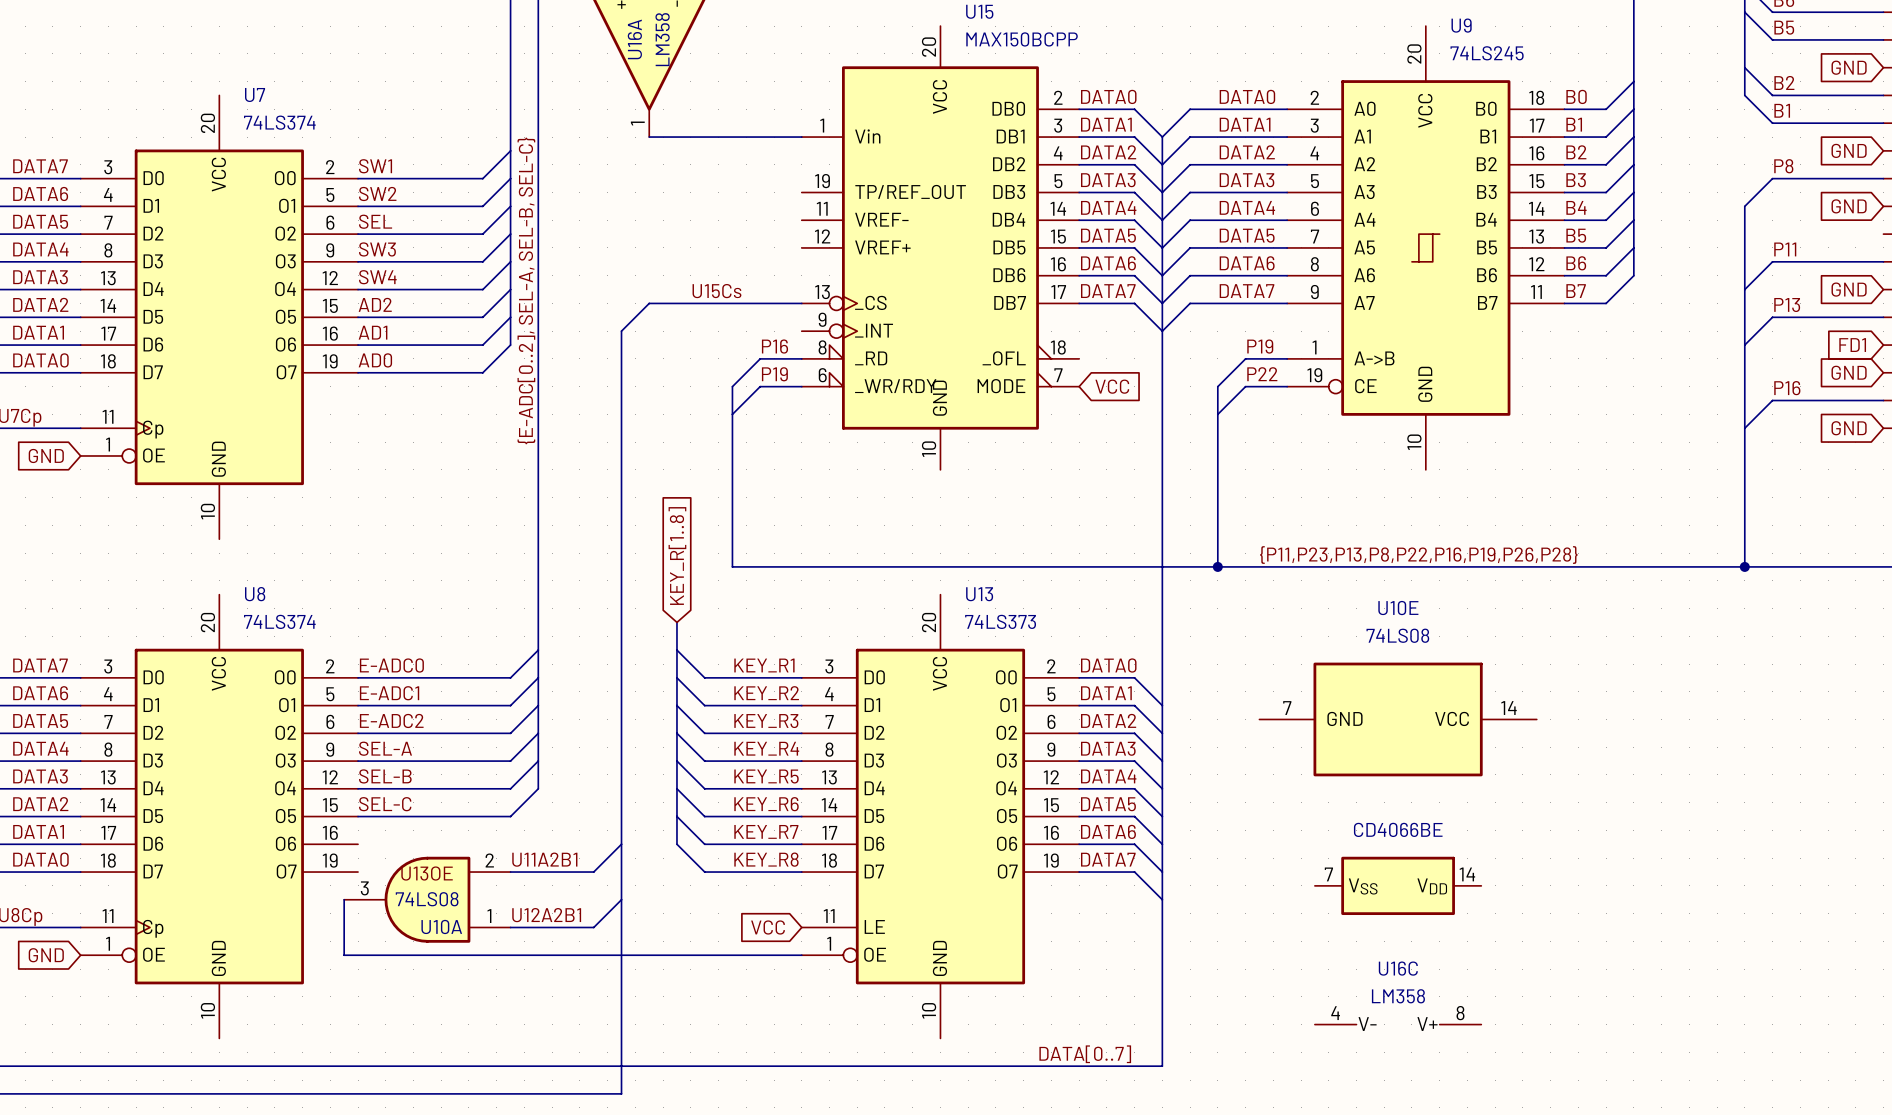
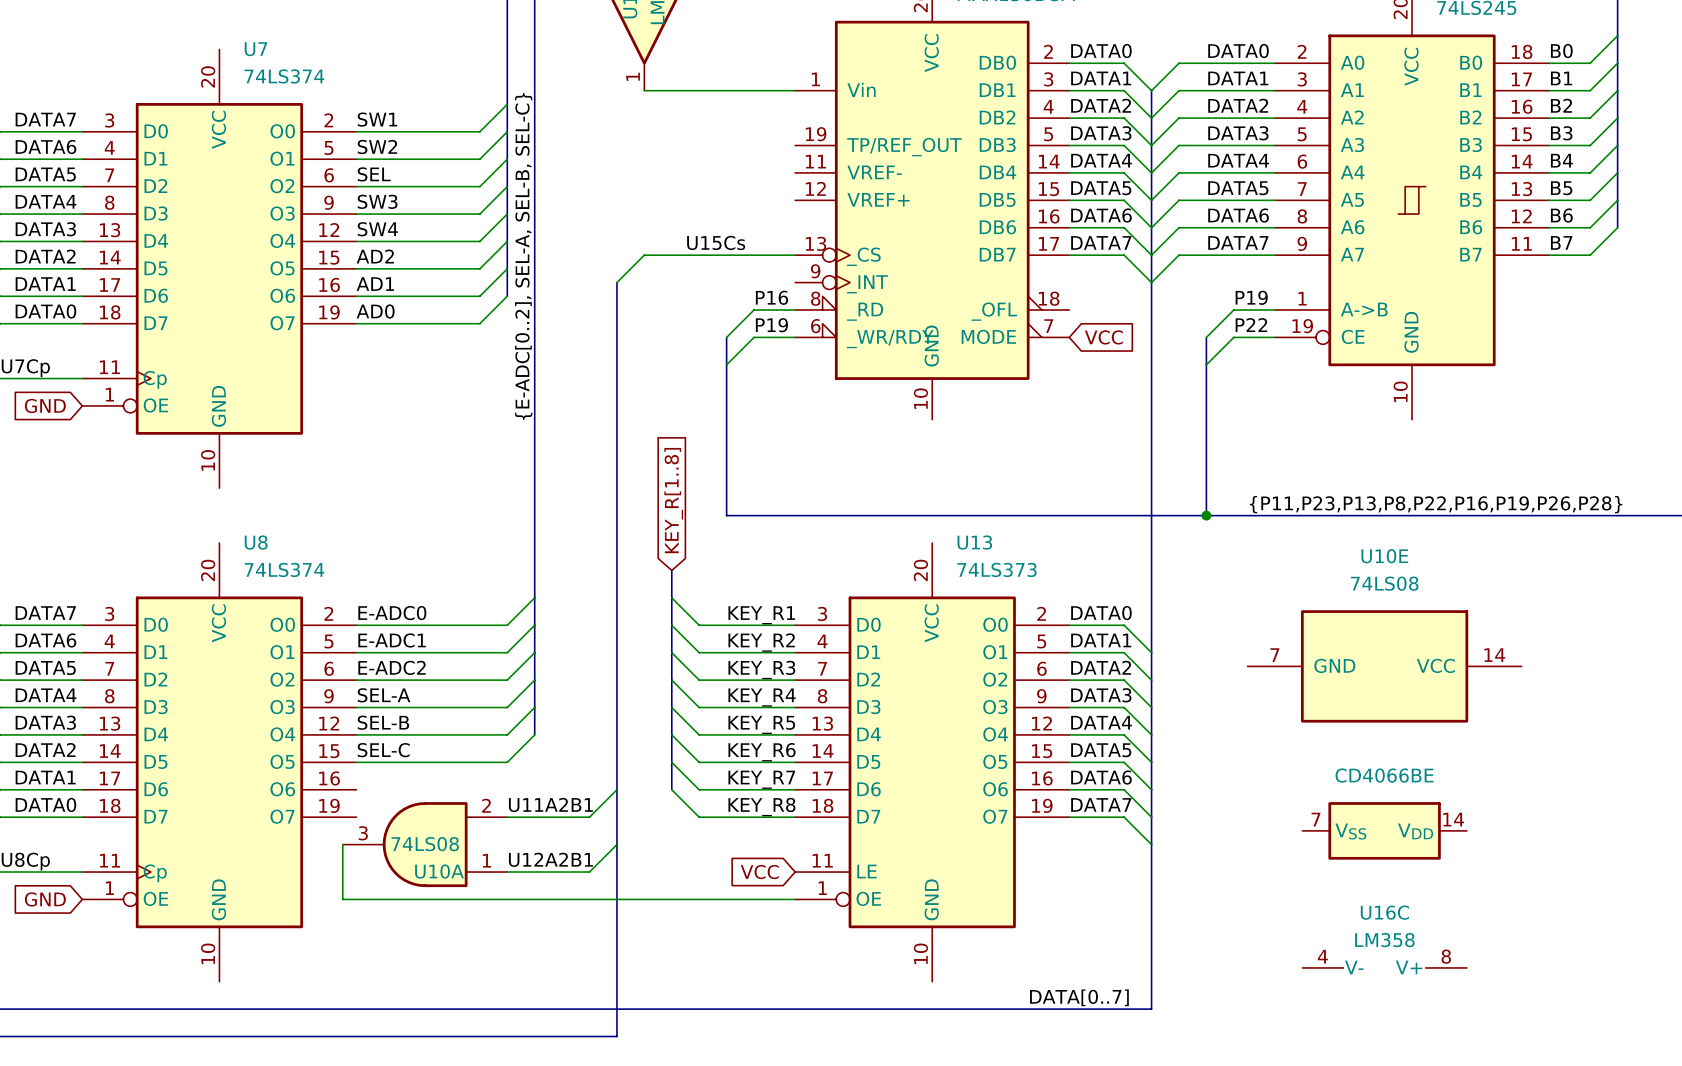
label: U13OE (427, 873) -> none

